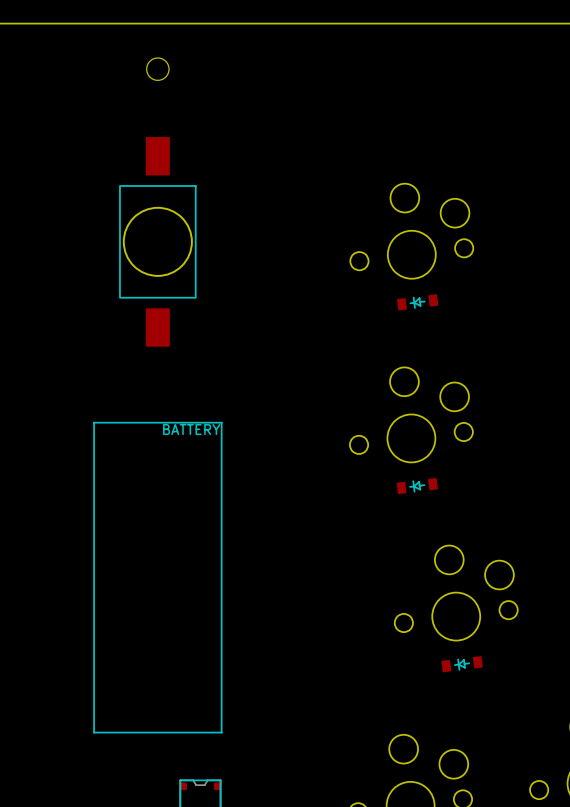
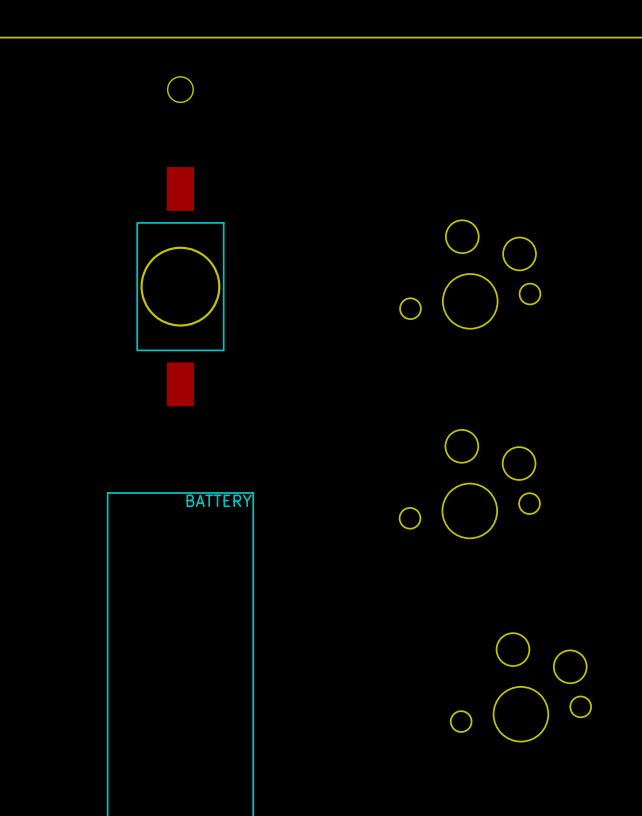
part: (417, 302) -> none
part: (417, 486) -> none
part: (462, 664) -> none

